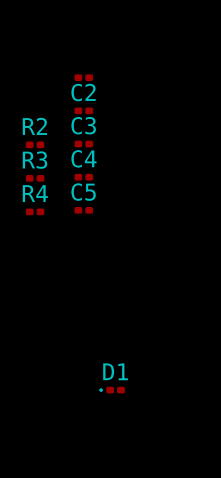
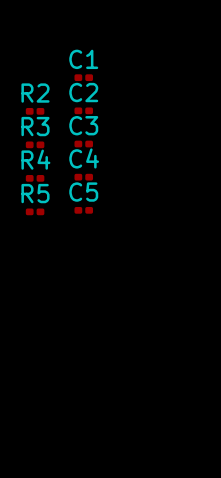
C1 name: none -> C1 (83, 59)
R2: none -> (35, 111)
R2 name: R2 (34, 126) -> R3 (35, 126)
R3 name: R3 (35, 160) -> R4 (35, 159)
R4 name: R4 (35, 193) -> R5 (35, 193)
D1: (112, 390) -> none

